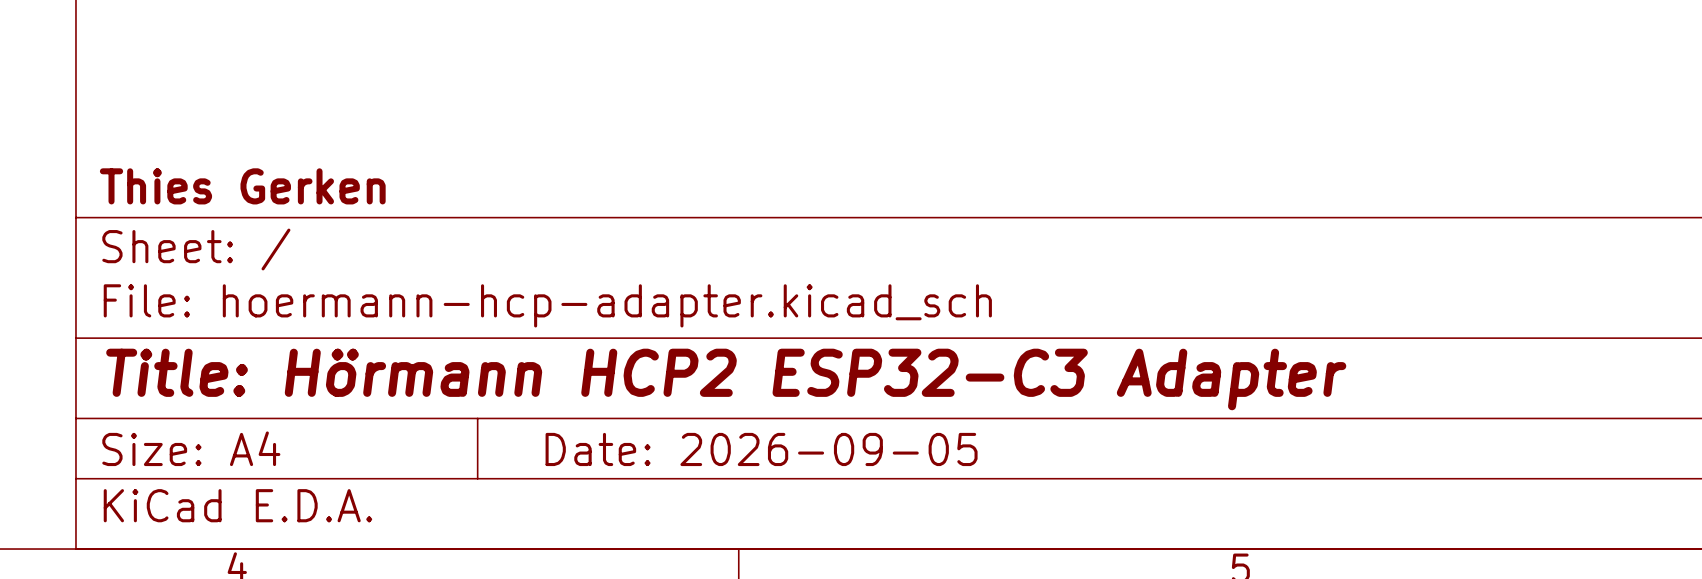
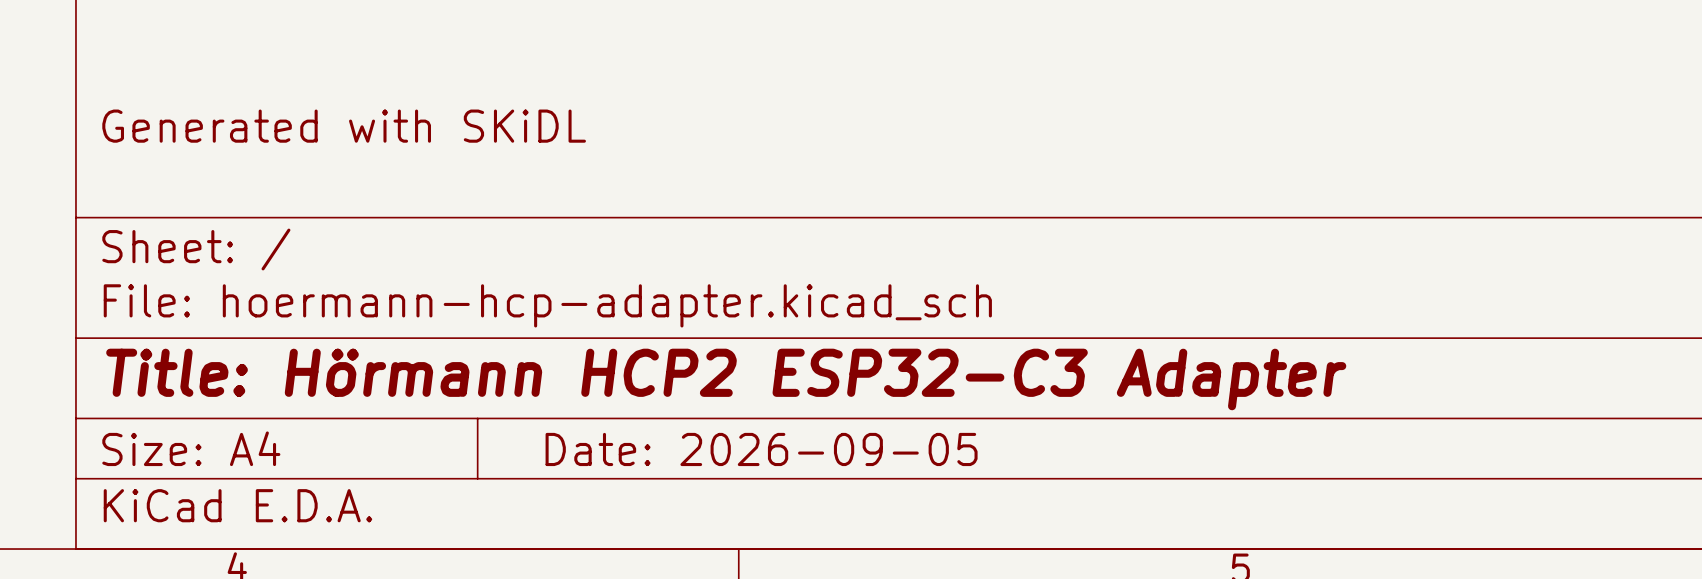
title block: none -> Generated with SKiDL (344, 126)
title block: Thies Gerken (242, 186) -> none

